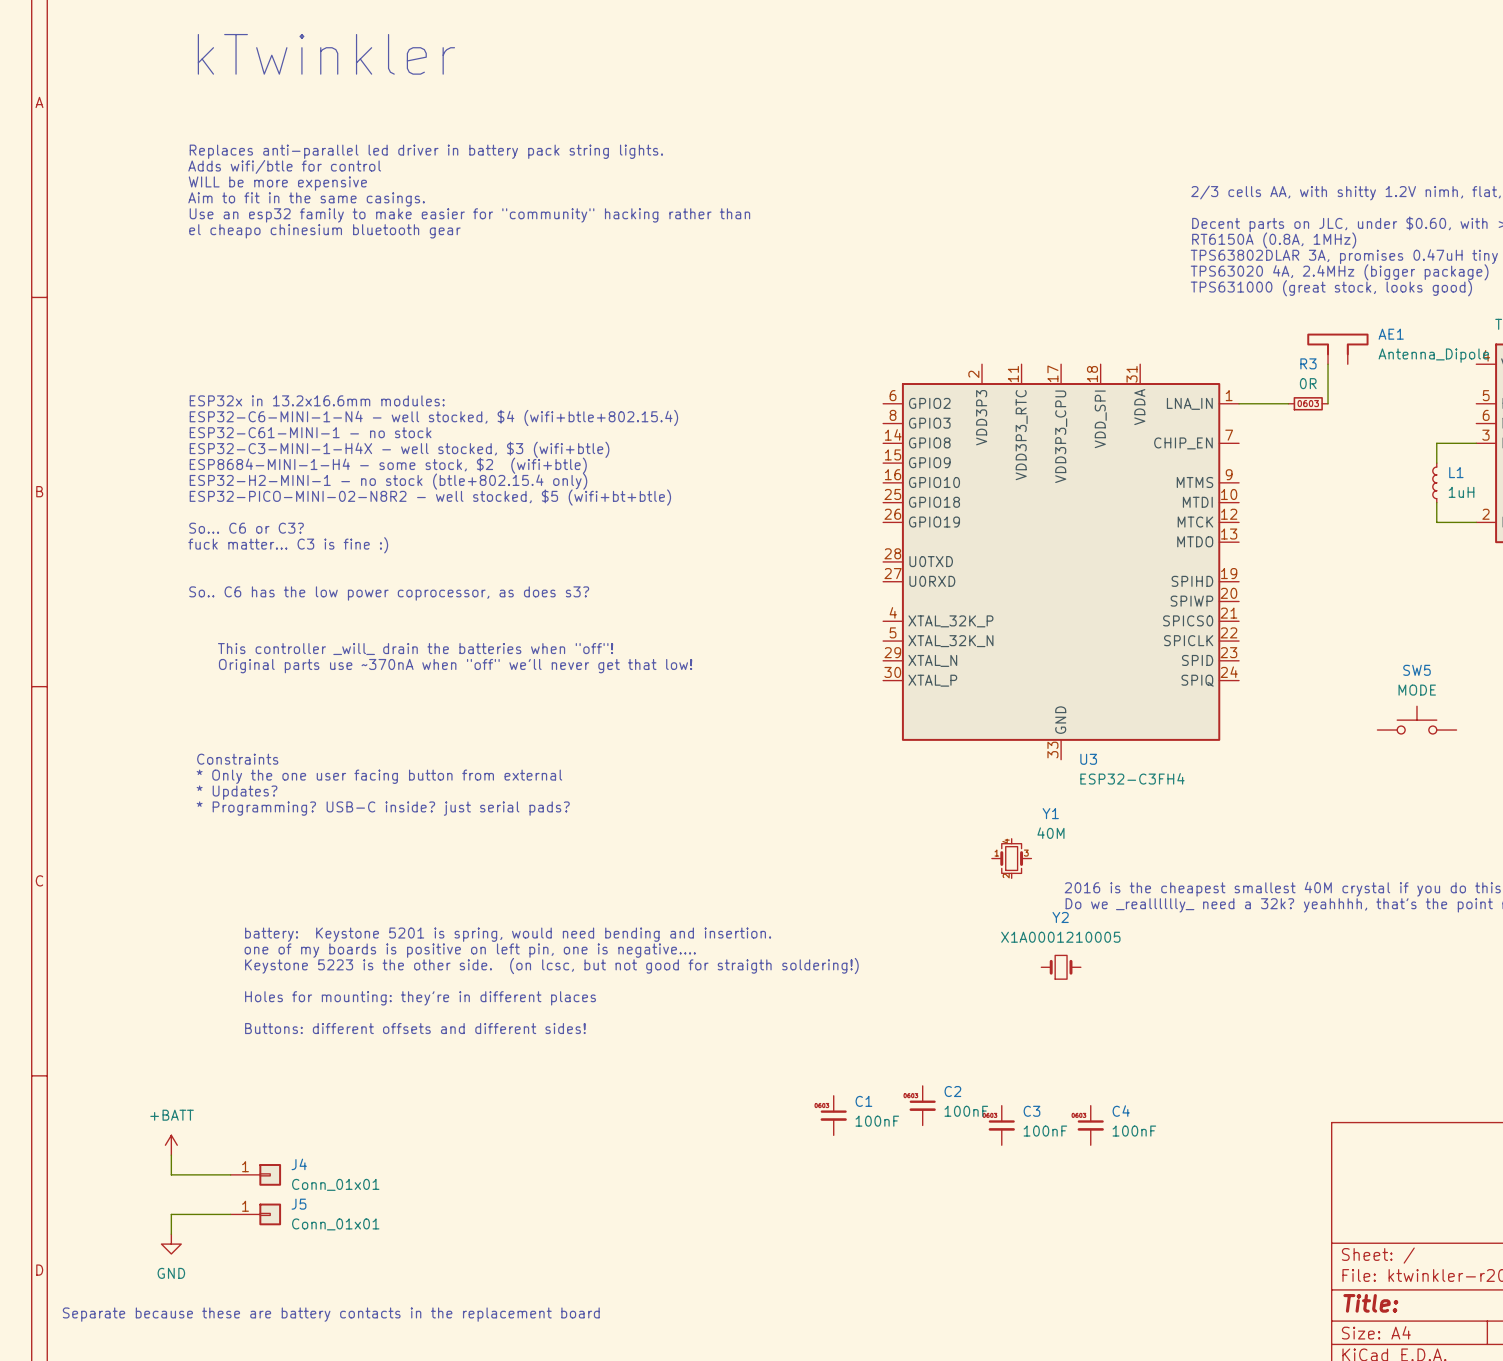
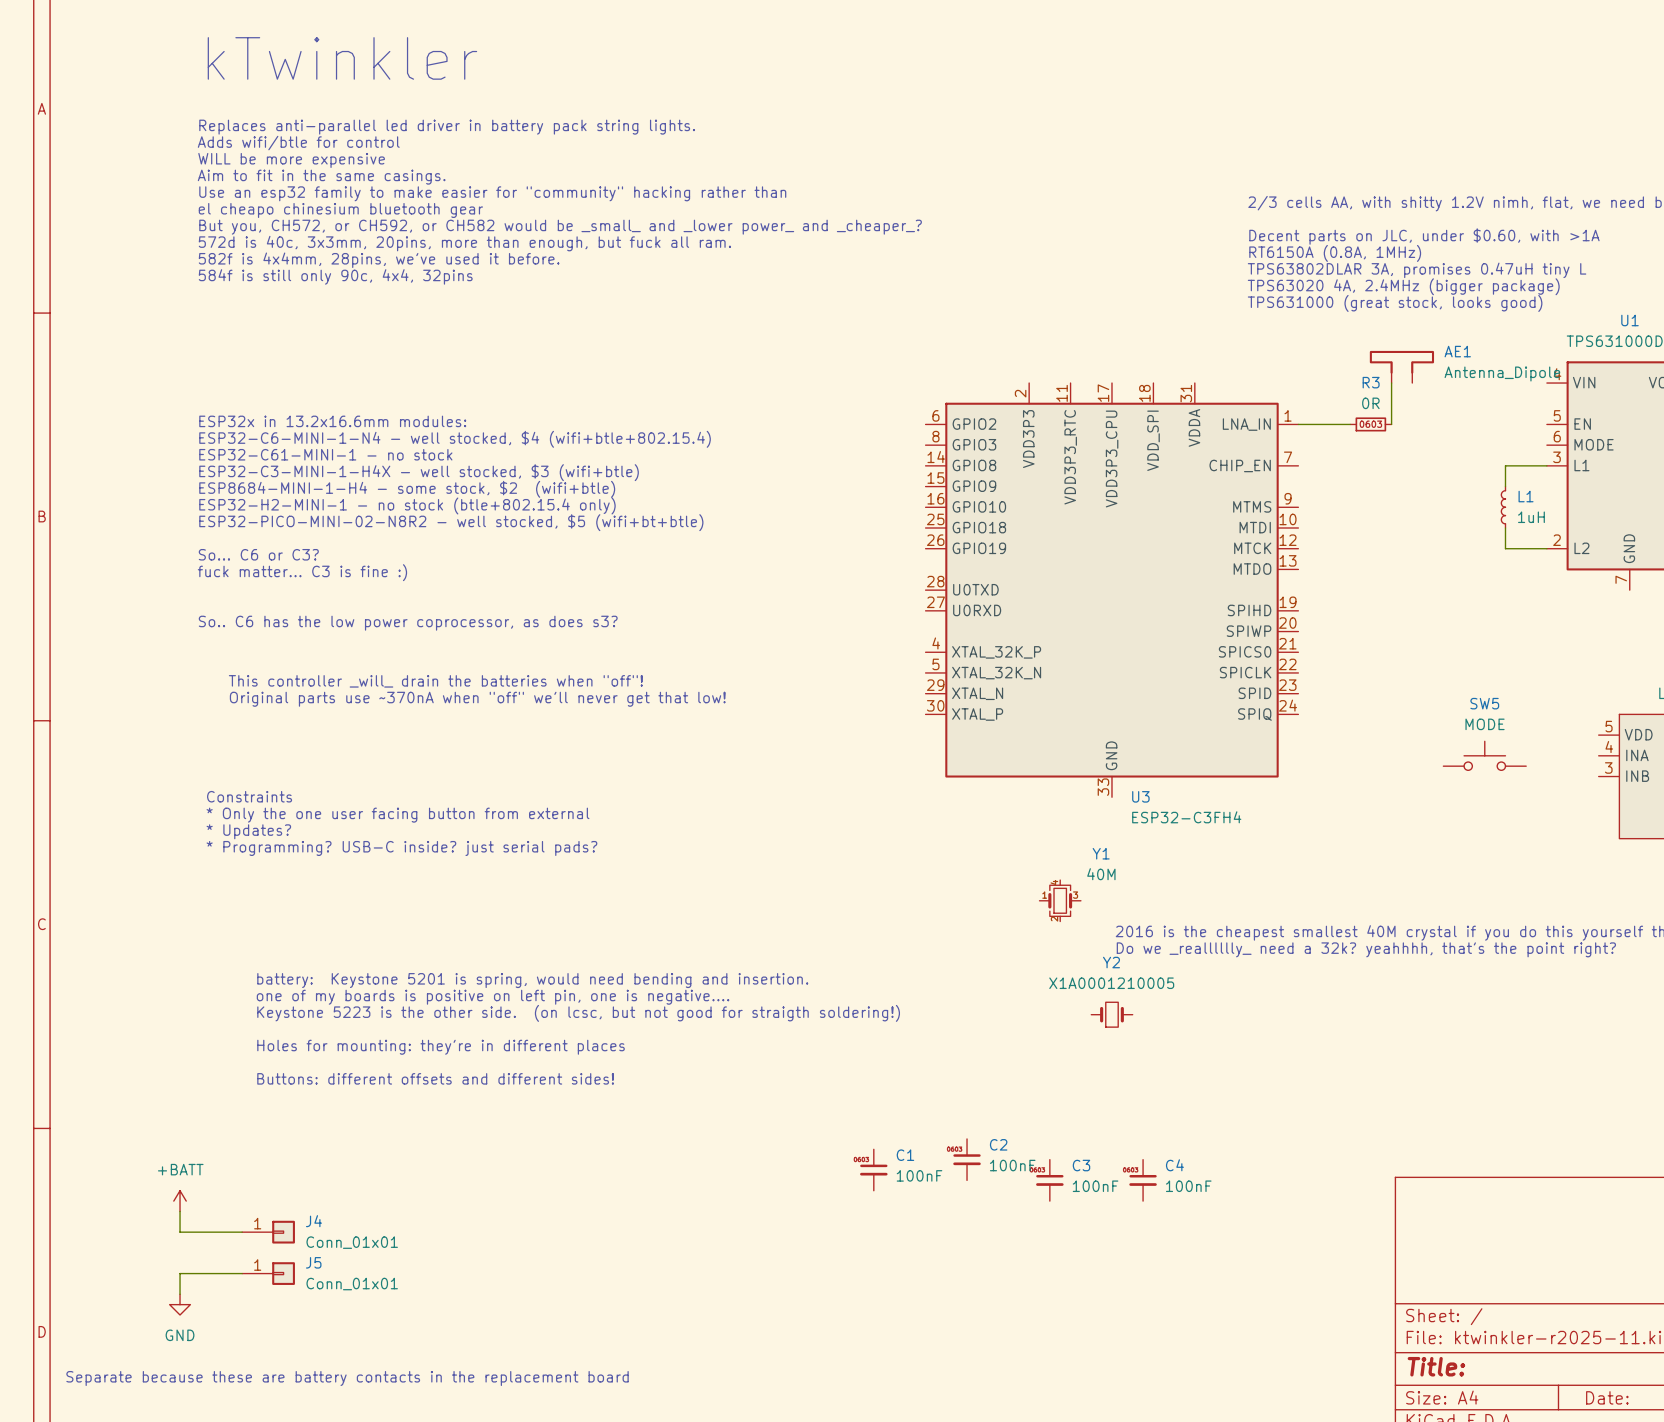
text: none -> Replaces anti-parallel led driver in battery pack string lights. (447, 127)
text: none -> Adds wifi/btle for control (298, 143)
text: Replaces anti-parallel led driver in battery pack string lights. (426, 151) -> WILL be more expensive (291, 160)
text: Adds wifi/btle for control (284, 166) -> Aim to fit in the same casings. (321, 177)
text: WILL be more expensive (277, 183) -> Use an esp32 family to make easier for "community" hacking rather than (492, 193)
text: Aim to fit in the same casings. (306, 199) -> el cheapo chinesium bluetooth gear (340, 210)
text: Use an esp32 family to make easier for "community" hacking rather than (469, 215) -> But you, CH572, or CH592, or CH582 would be _small_ and _lower power_ and _cheaper_? (560, 227)
text: el cheapo chinesium bluetooth gear (324, 231) -> 572d is 40c, 3x3mm, 20pins, more than enough, but fuck all ram. (464, 243)
text: none -> 582f is 4x4mm, 28pins, we've used it before. (379, 260)
text: none -> 584f is still only 90c, 4x4, 32pins (335, 276)

